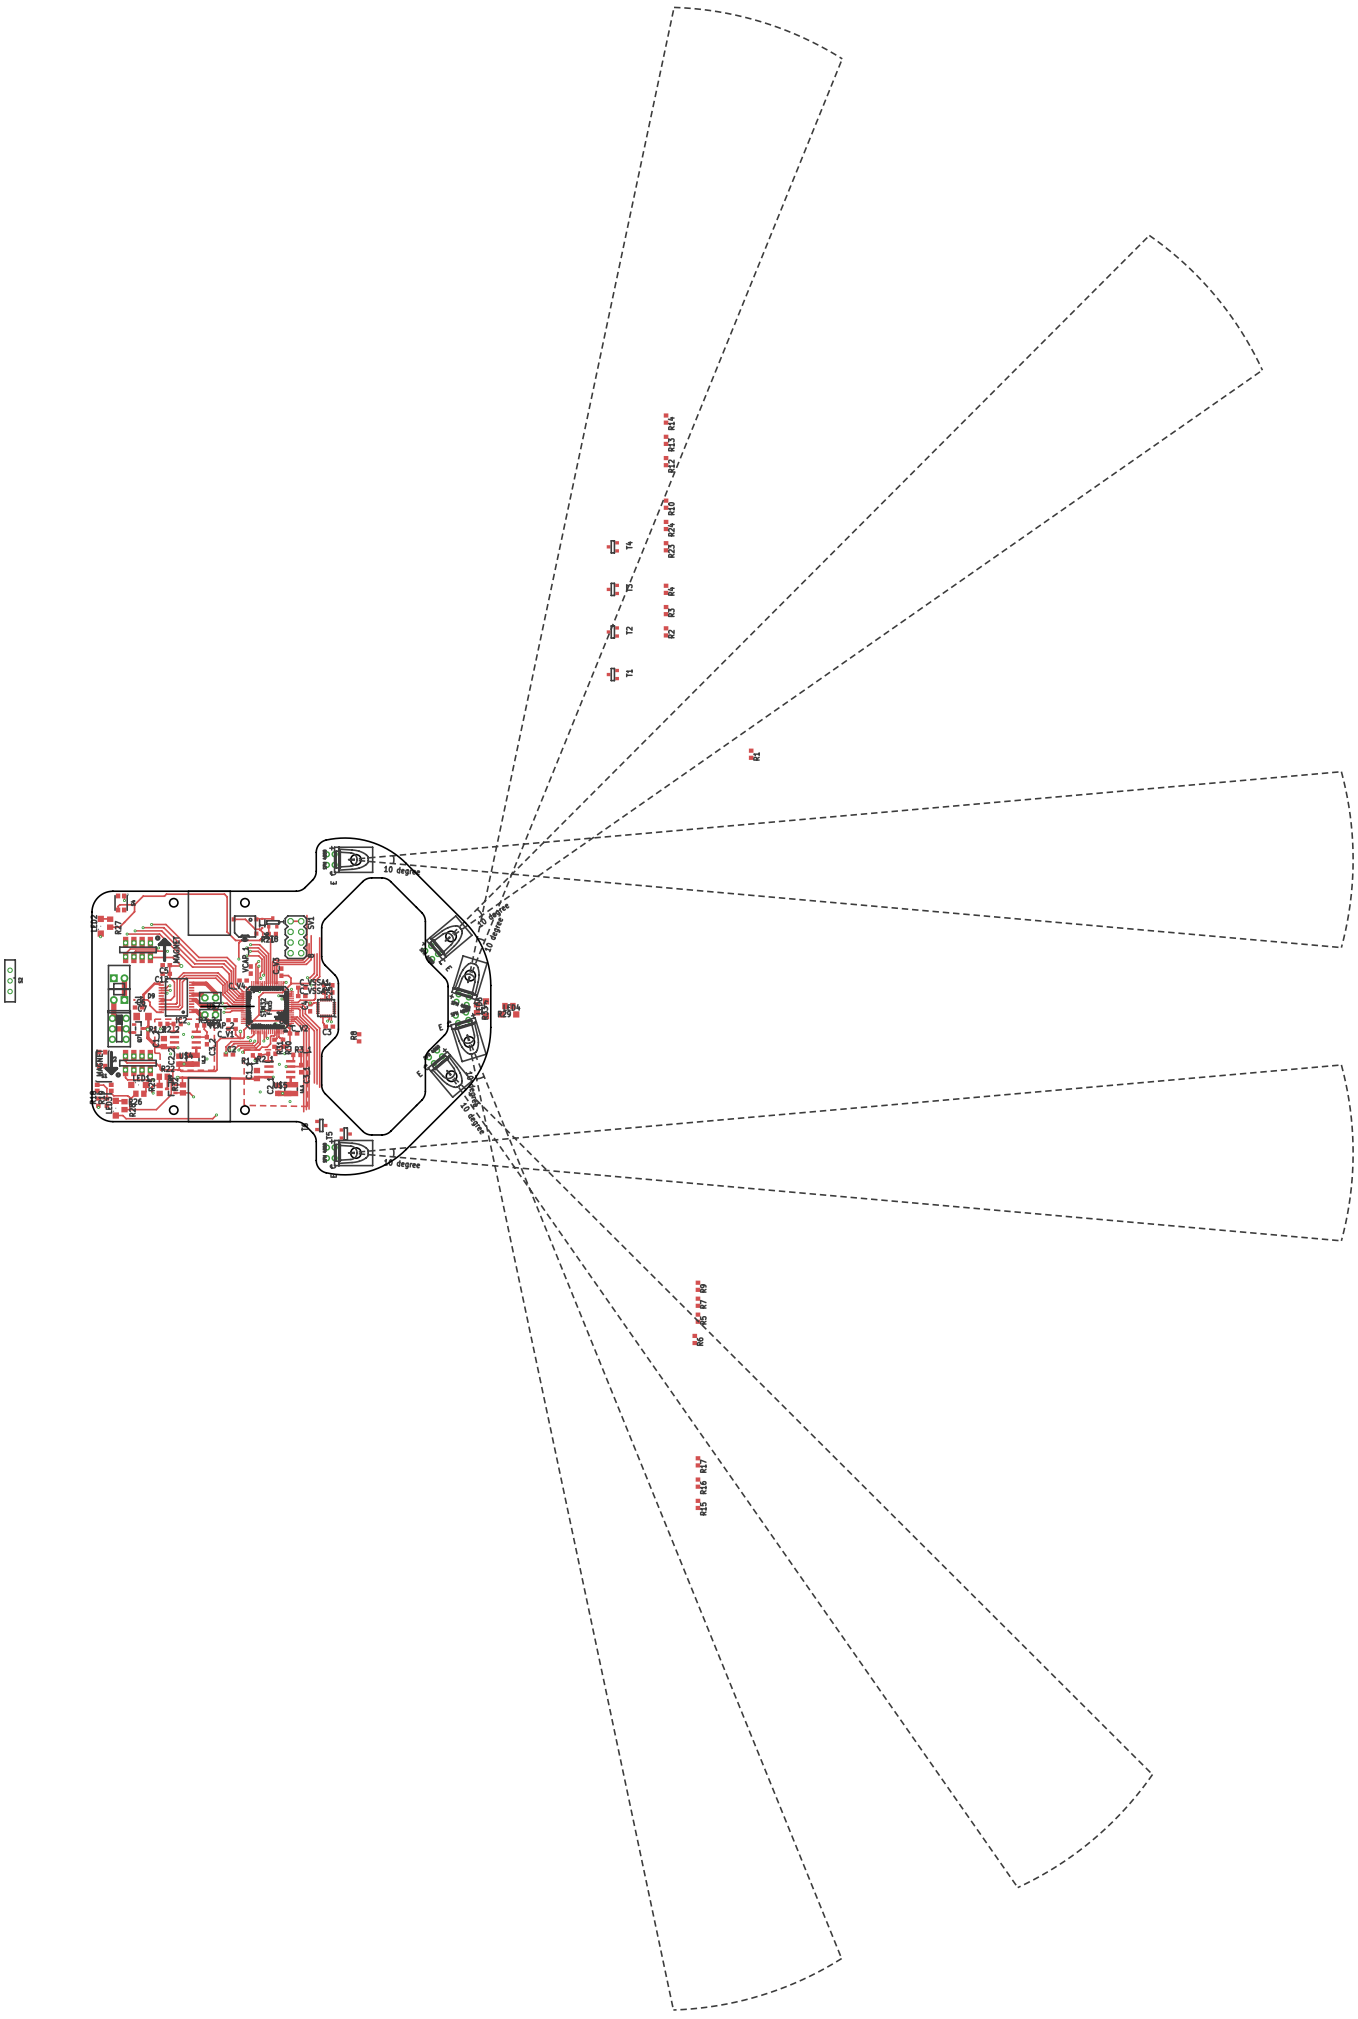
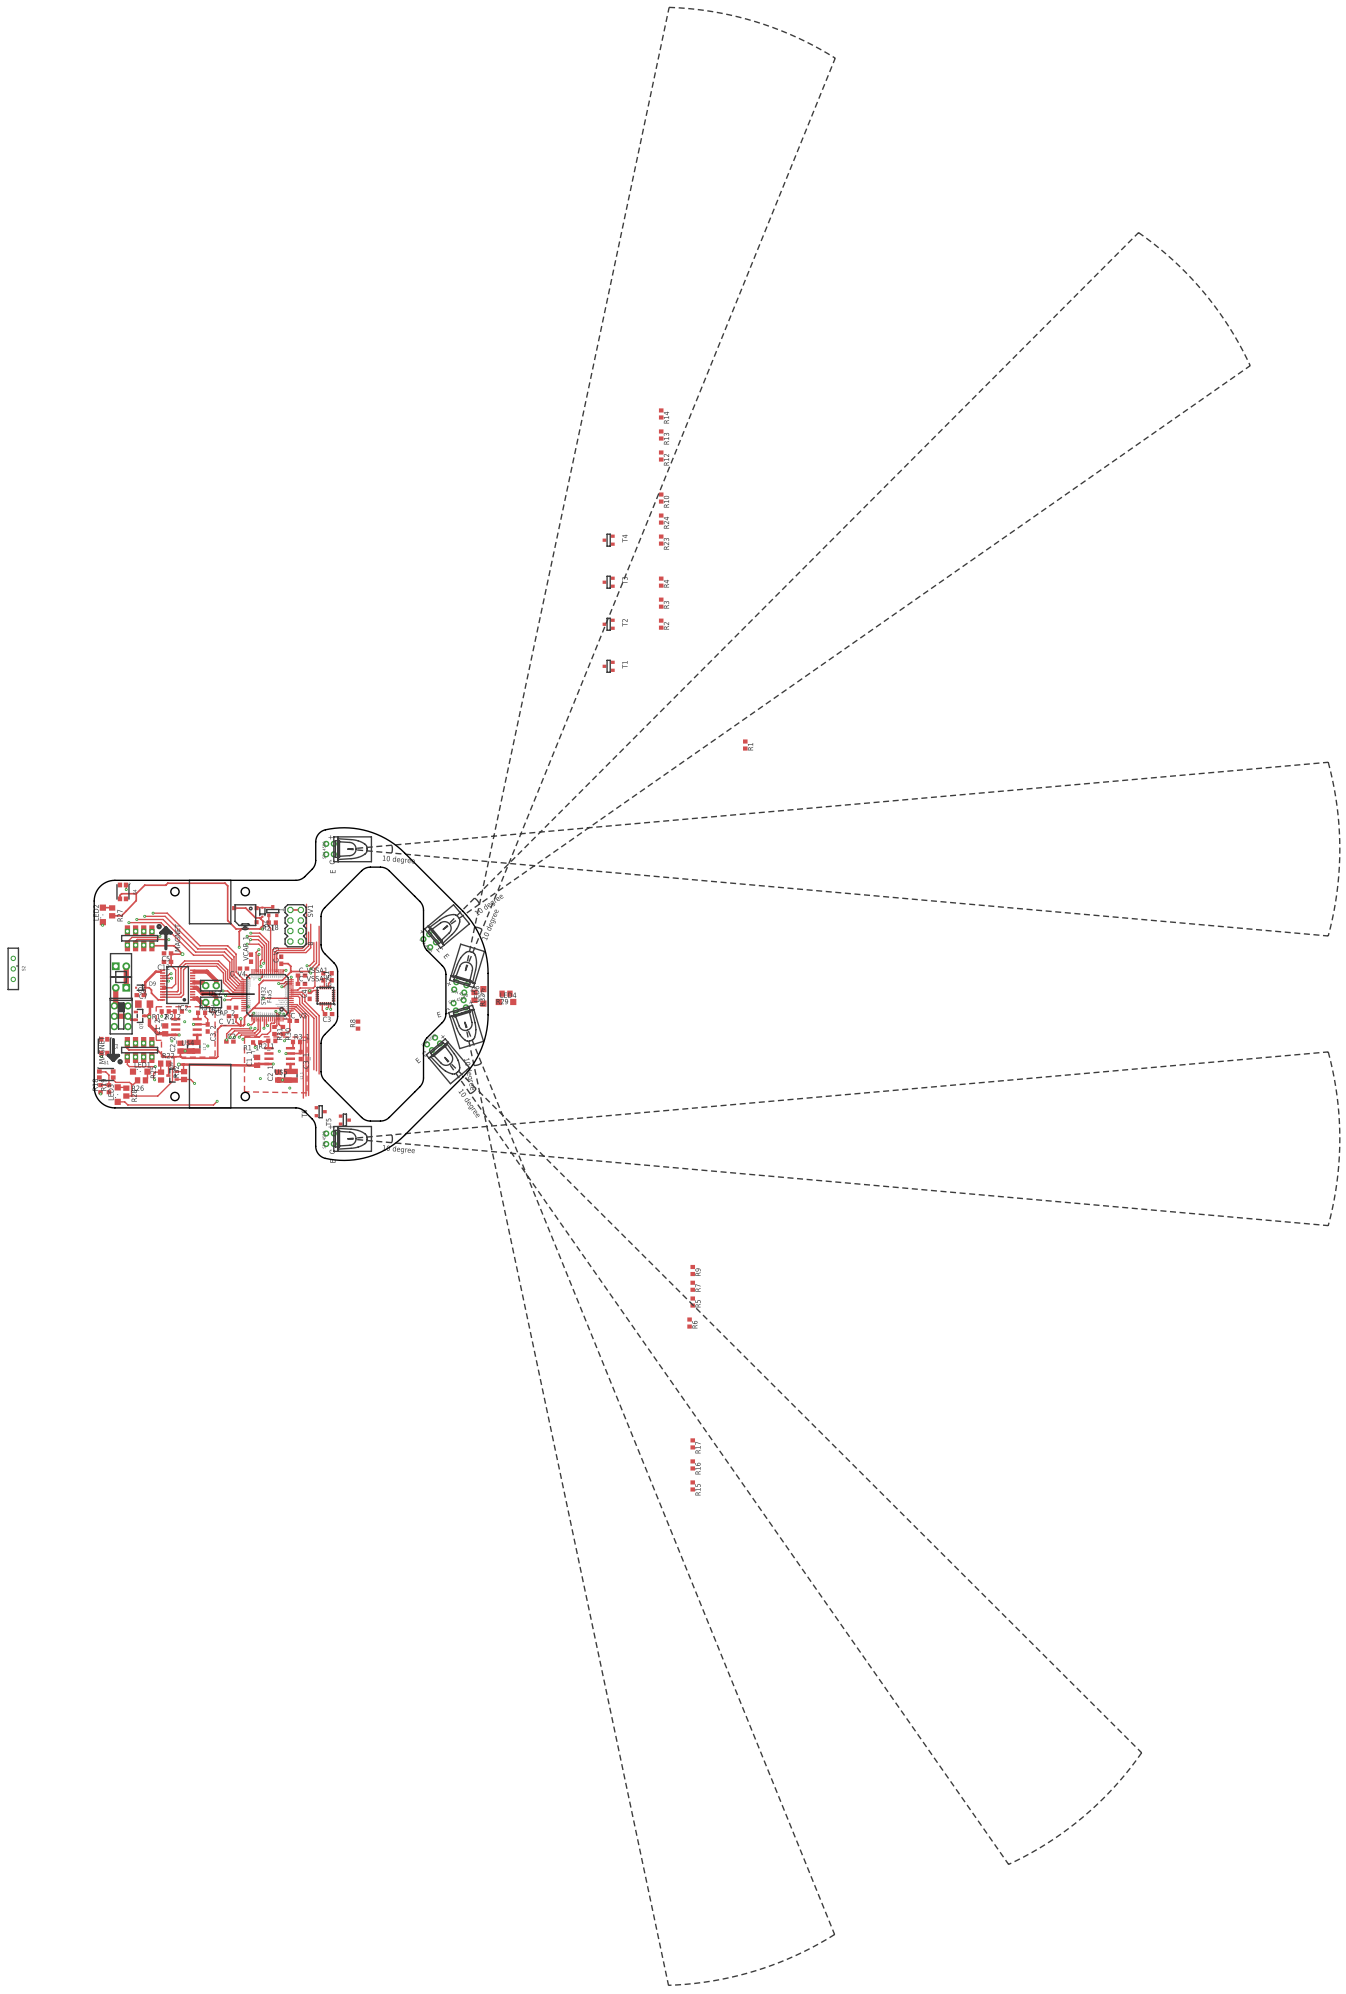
part footprint: [451, 7, 843, 1008] -> [449, 7, 836, 996]
part footprint: [422, 235, 1263, 963] -> [420, 232, 1251, 951]
part footprint: [323, 771, 1354, 948] -> [323, 761, 1341, 937]
part footprint: [450, 1009, 842, 2011] -> [448, 997, 835, 1986]
part footprint: [425, 1047, 1153, 1888] -> [423, 1034, 1142, 1865]
part footprint: [323, 1064, 1354, 1242] -> [323, 1051, 1341, 1226]

